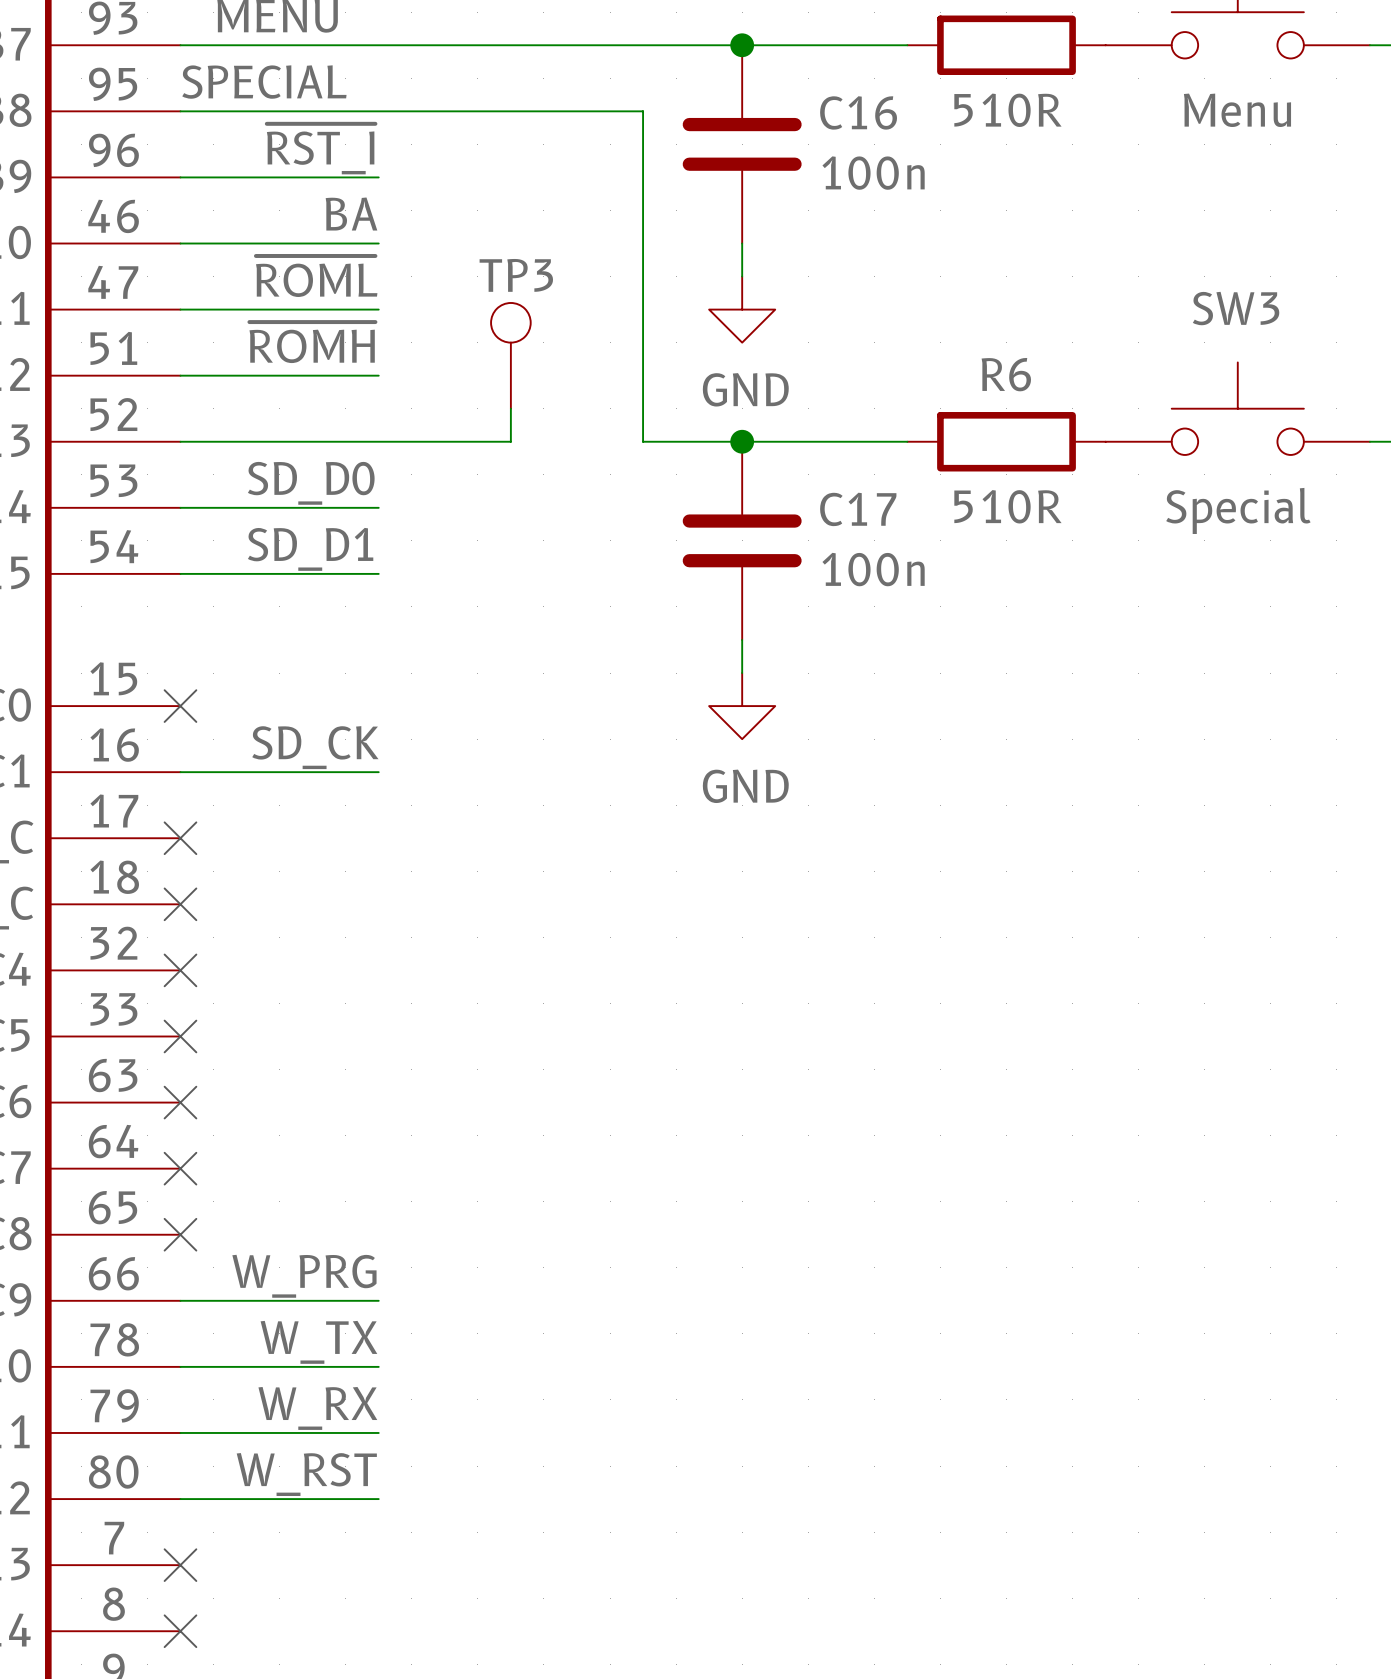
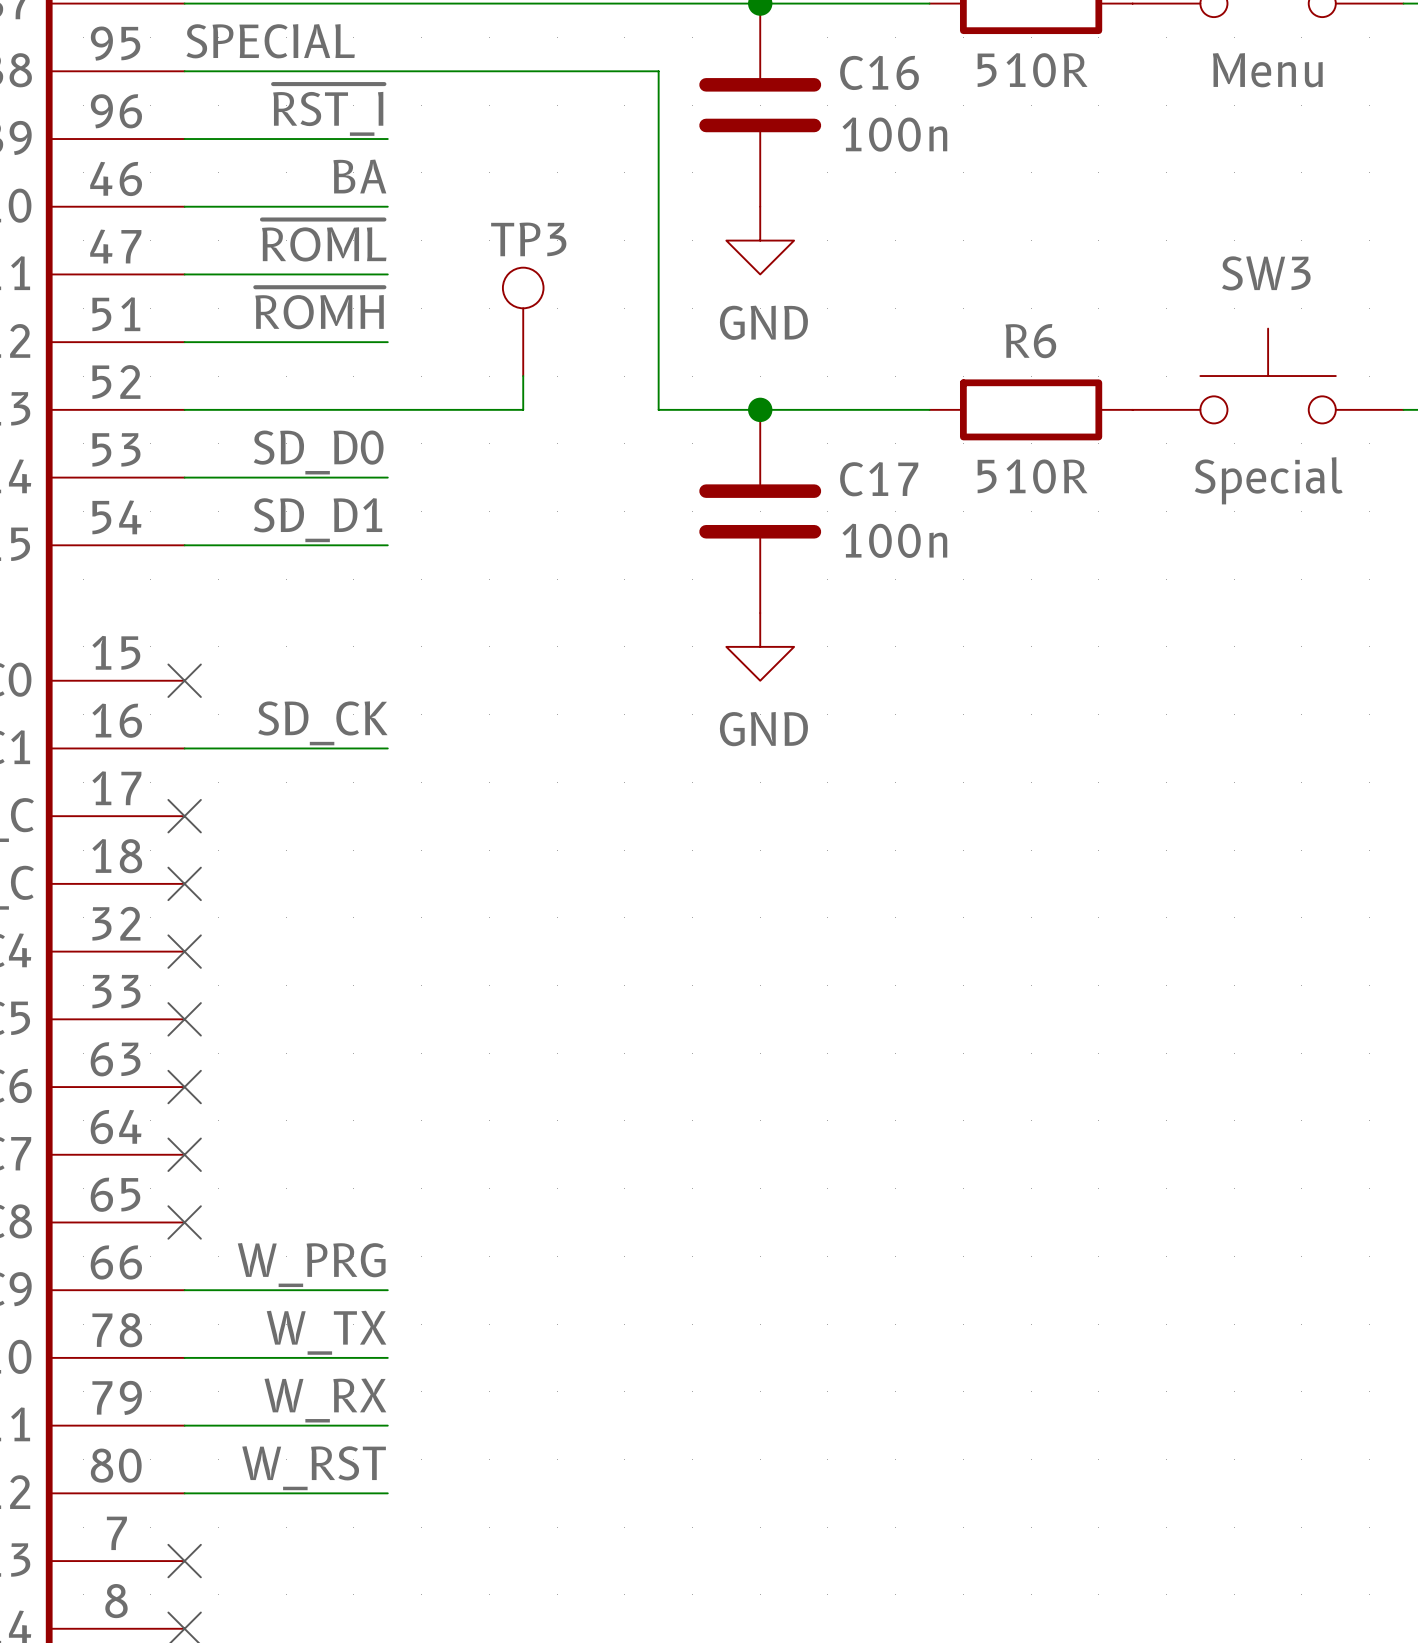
power symbol position: GND (742, 309) -> GND (760, 240)
power symbol position: GND (742, 706) -> GND (760, 646)

